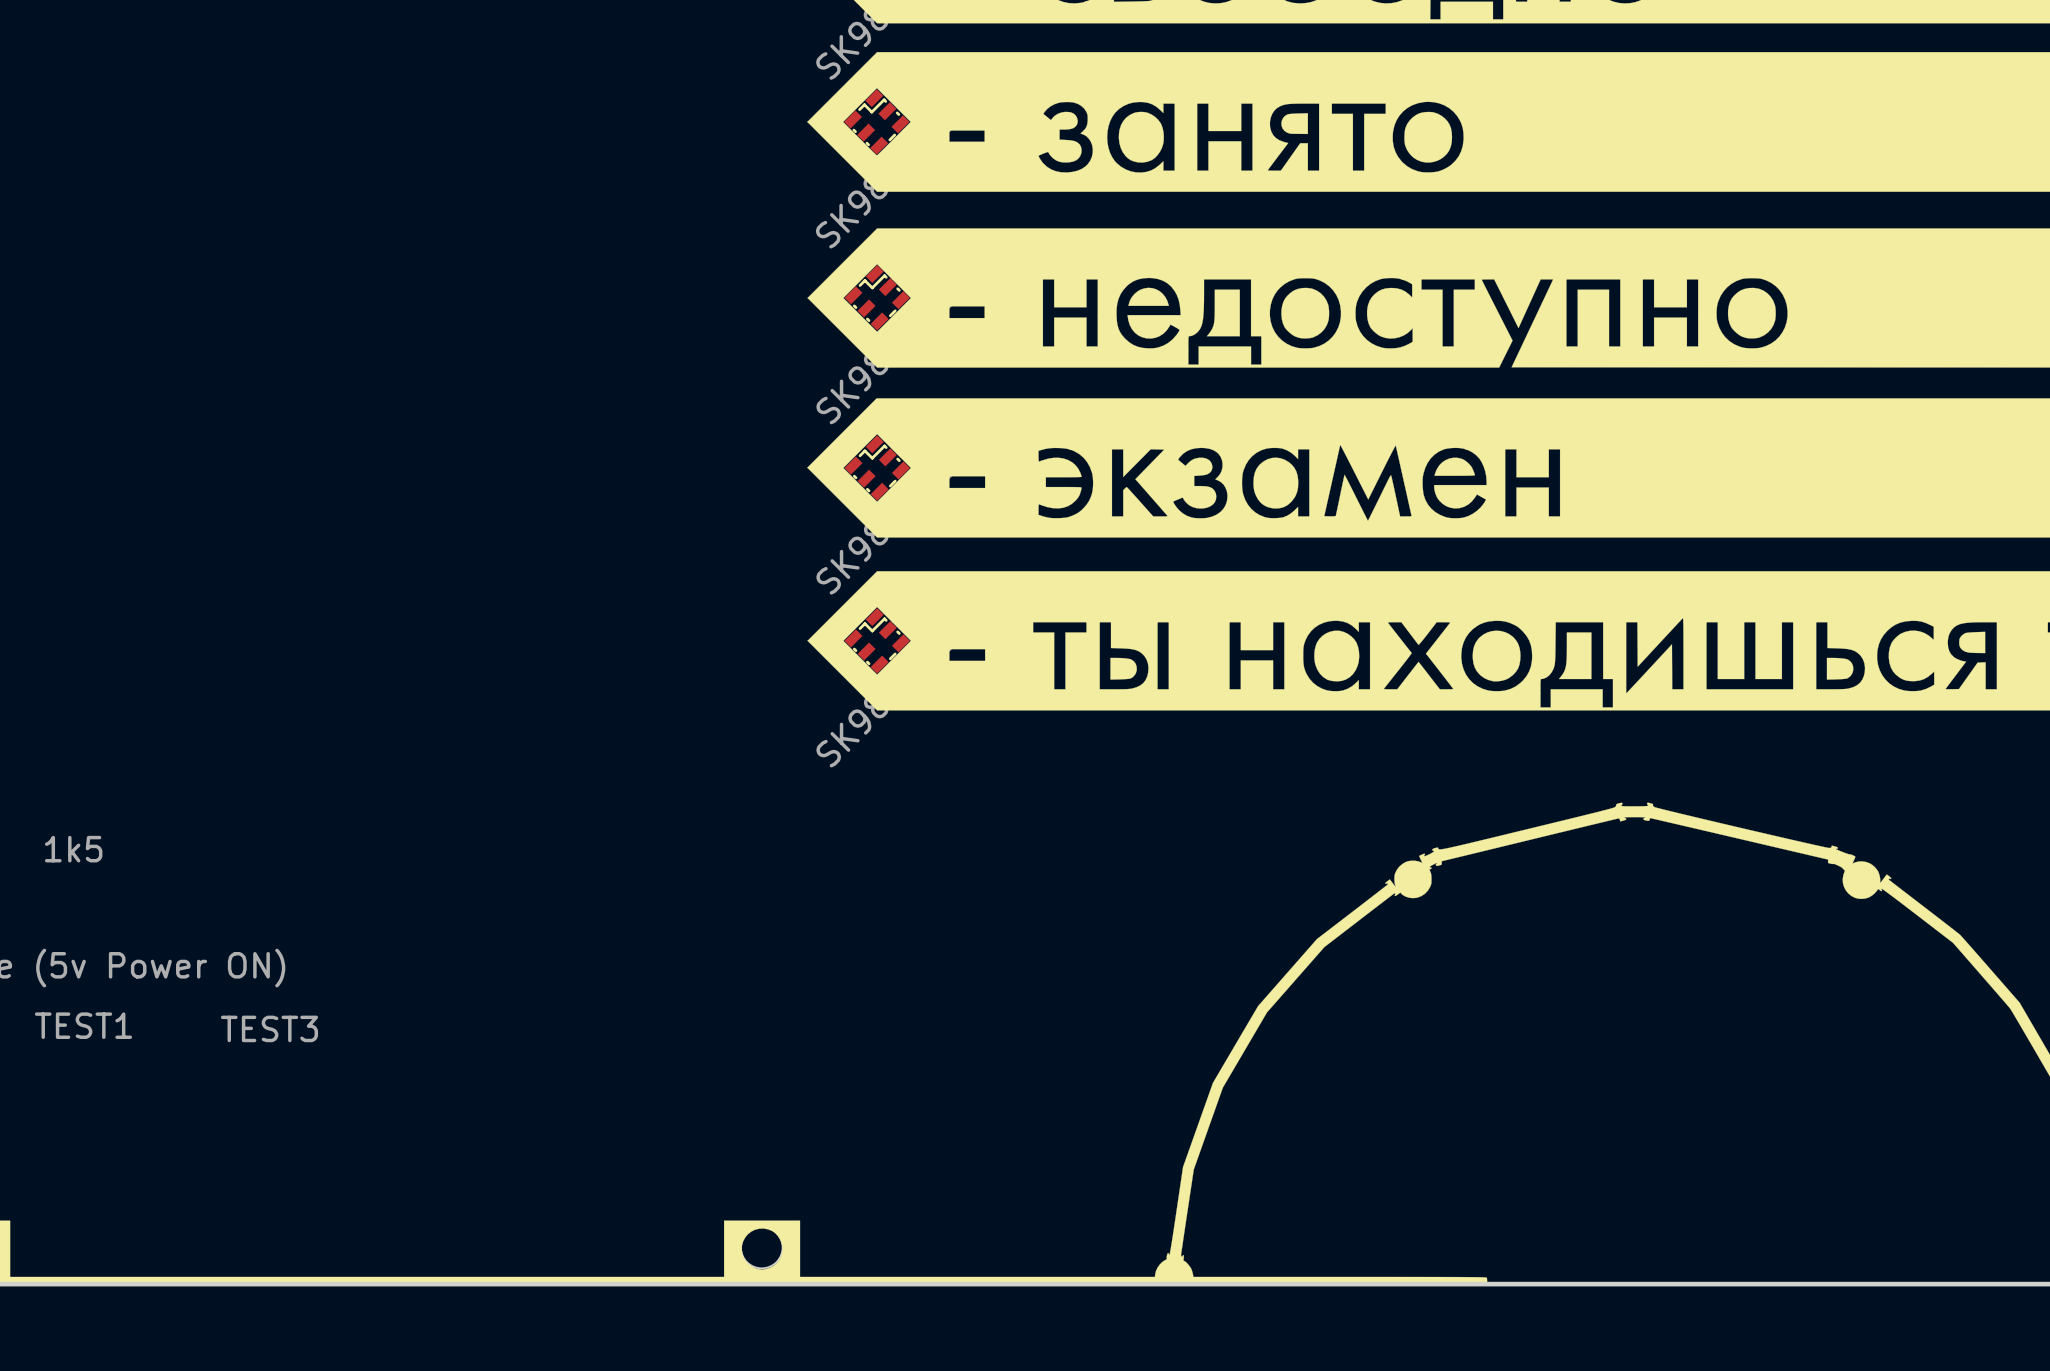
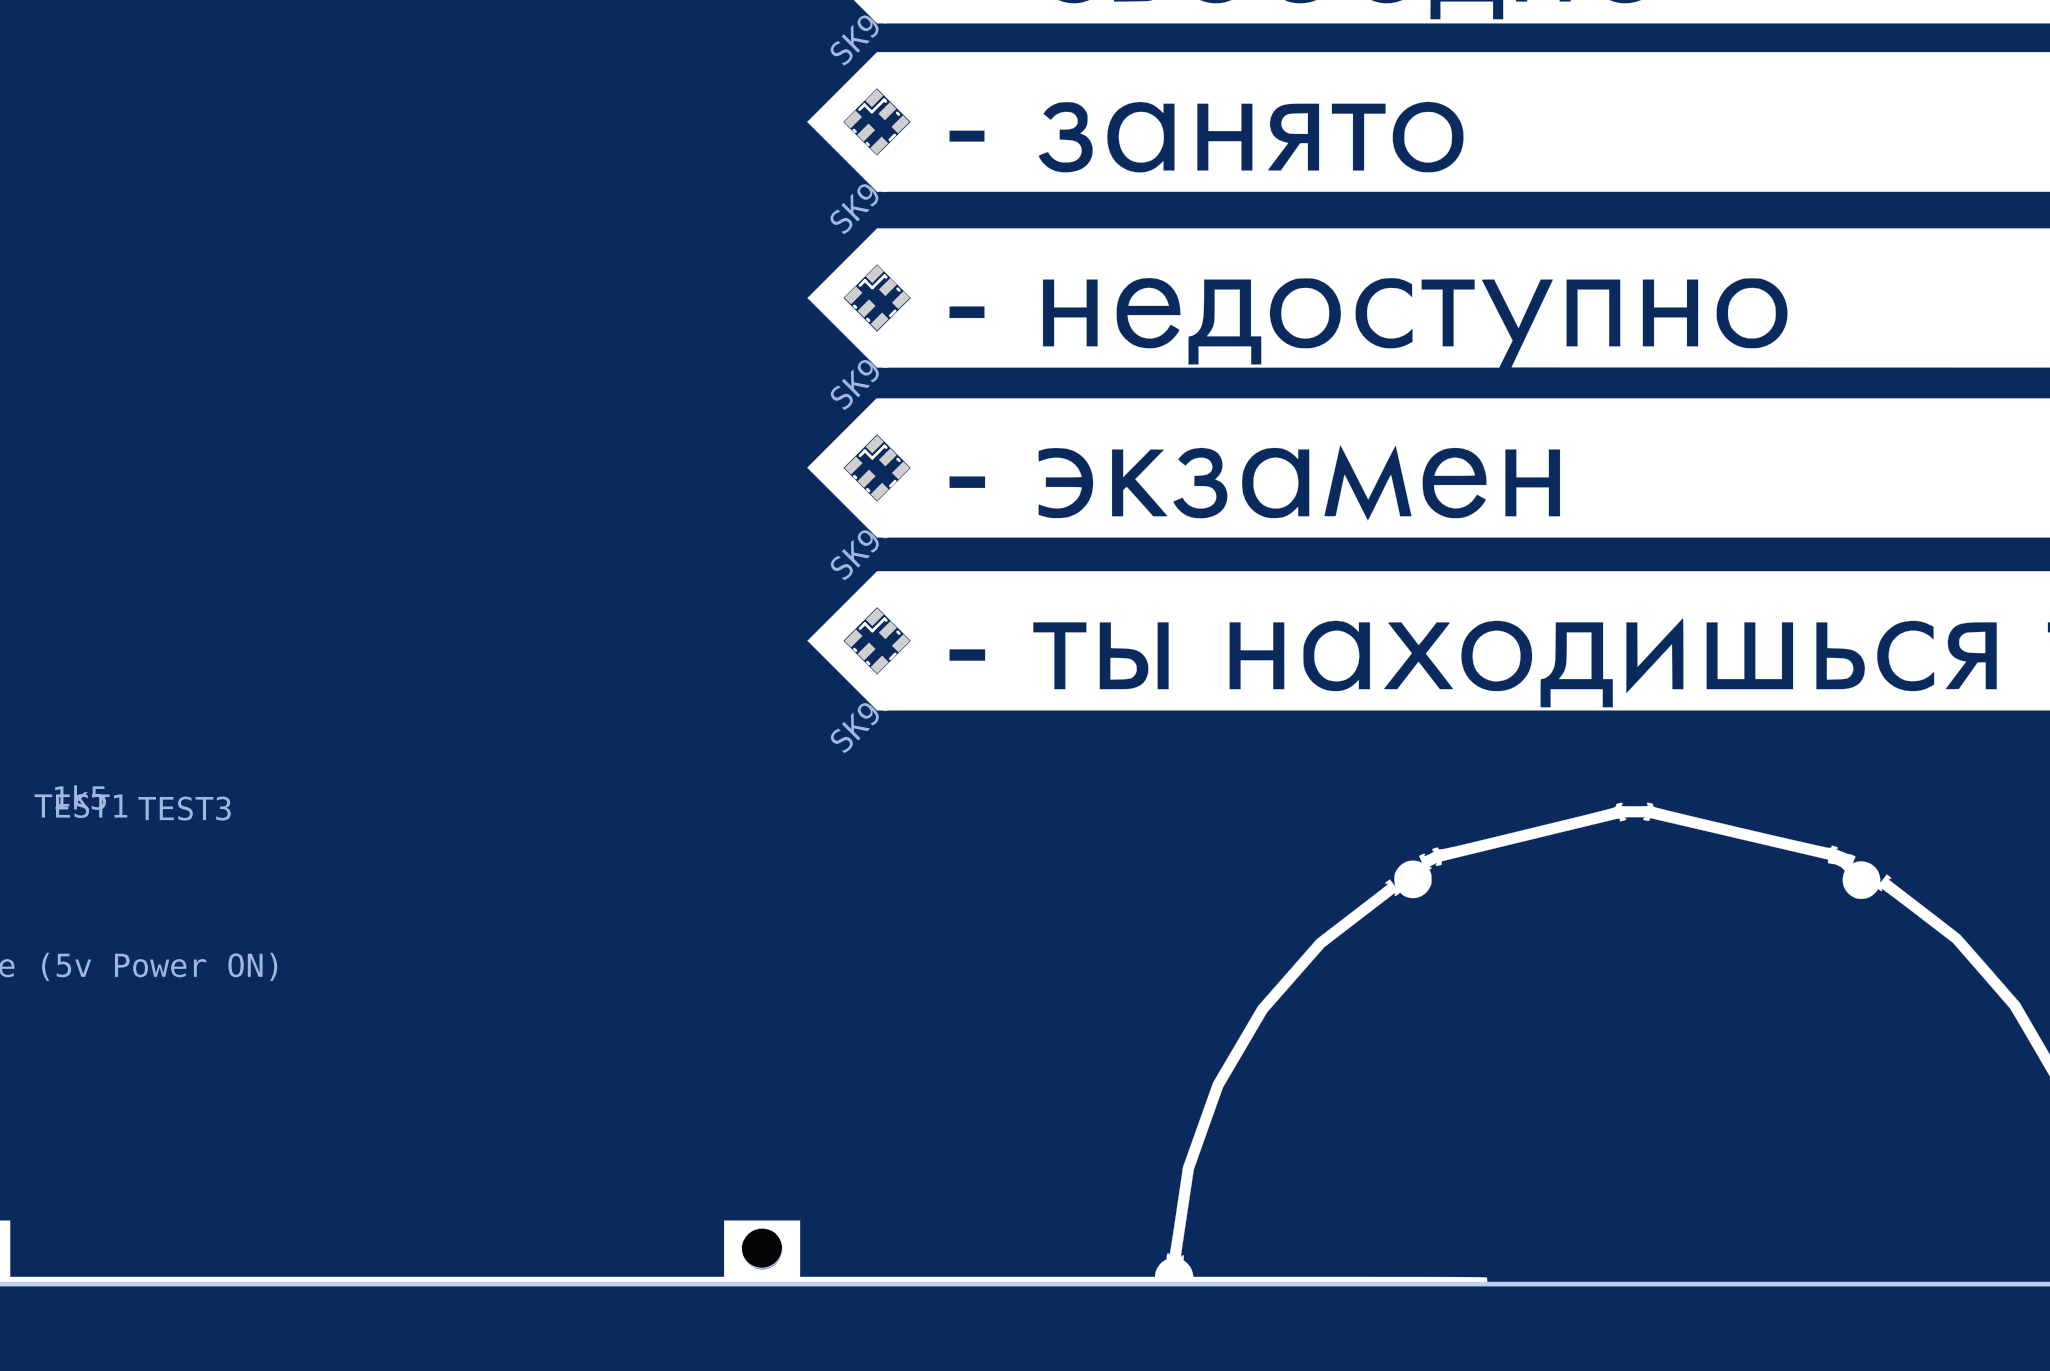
part position: (73, 849) -> (80, 797)
part position: (83, 1025) -> (80, 806)
part position: (269, 1028) -> (184, 808)

